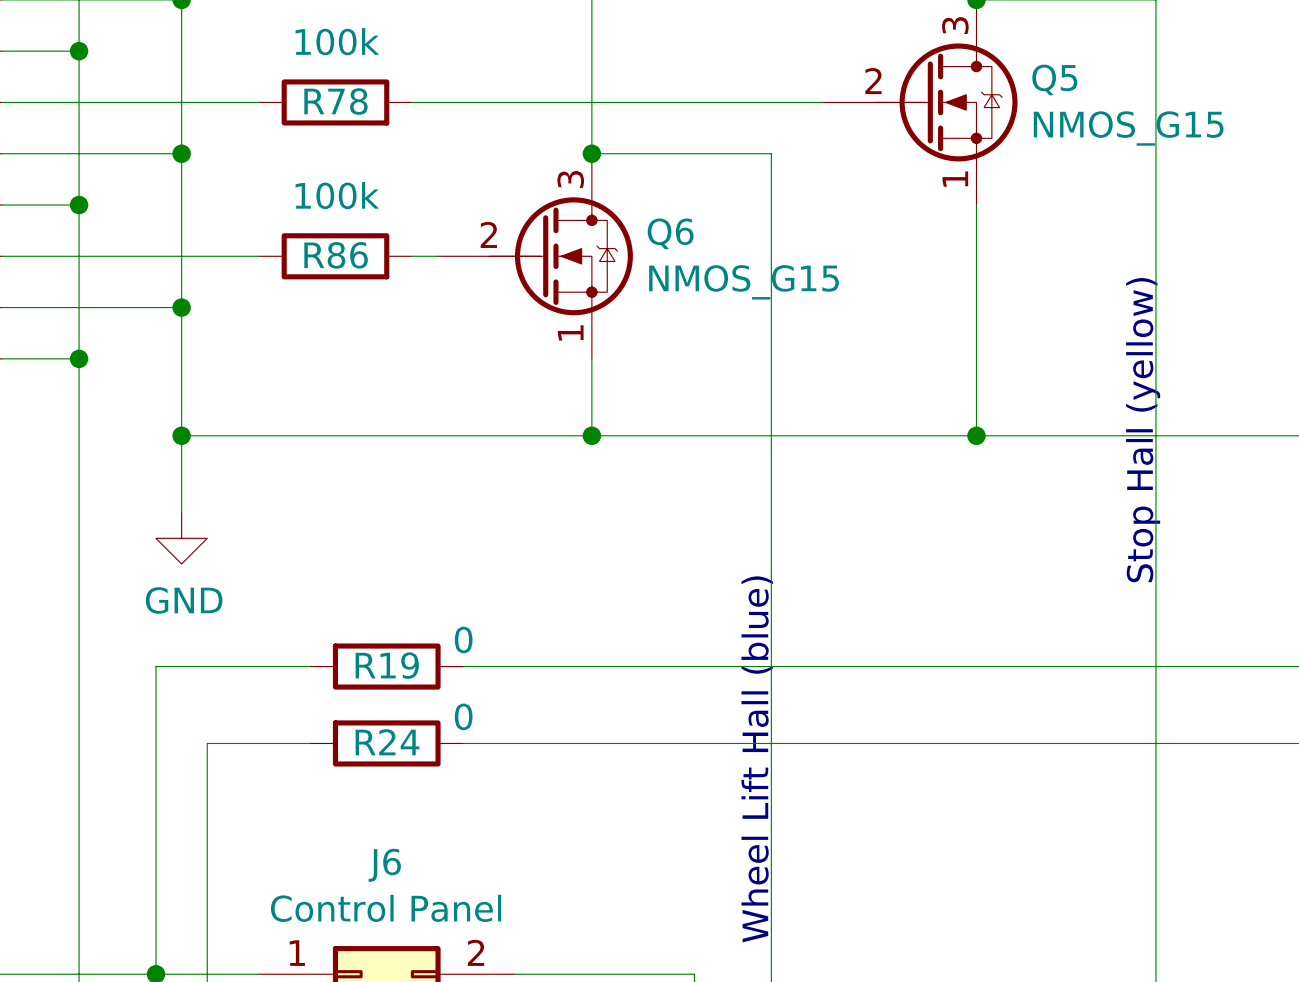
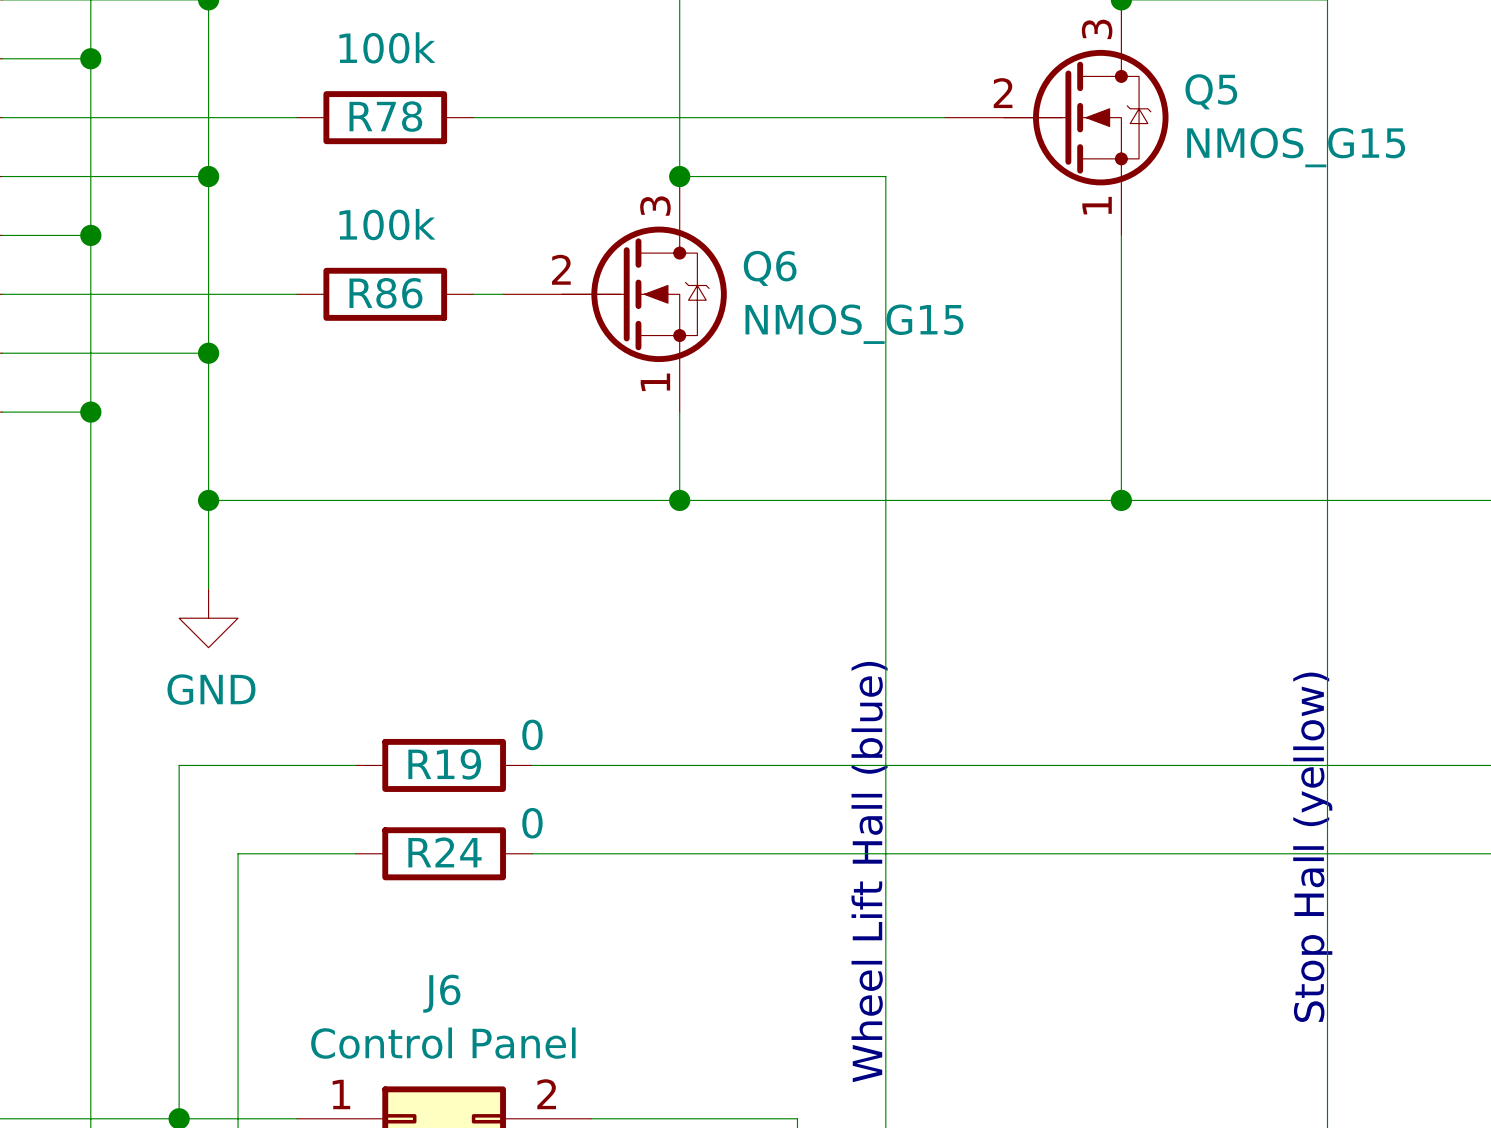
text position: Stop Hall (yellow) (1143, 430) -> Stop Hall (yellow) (1312, 847)

